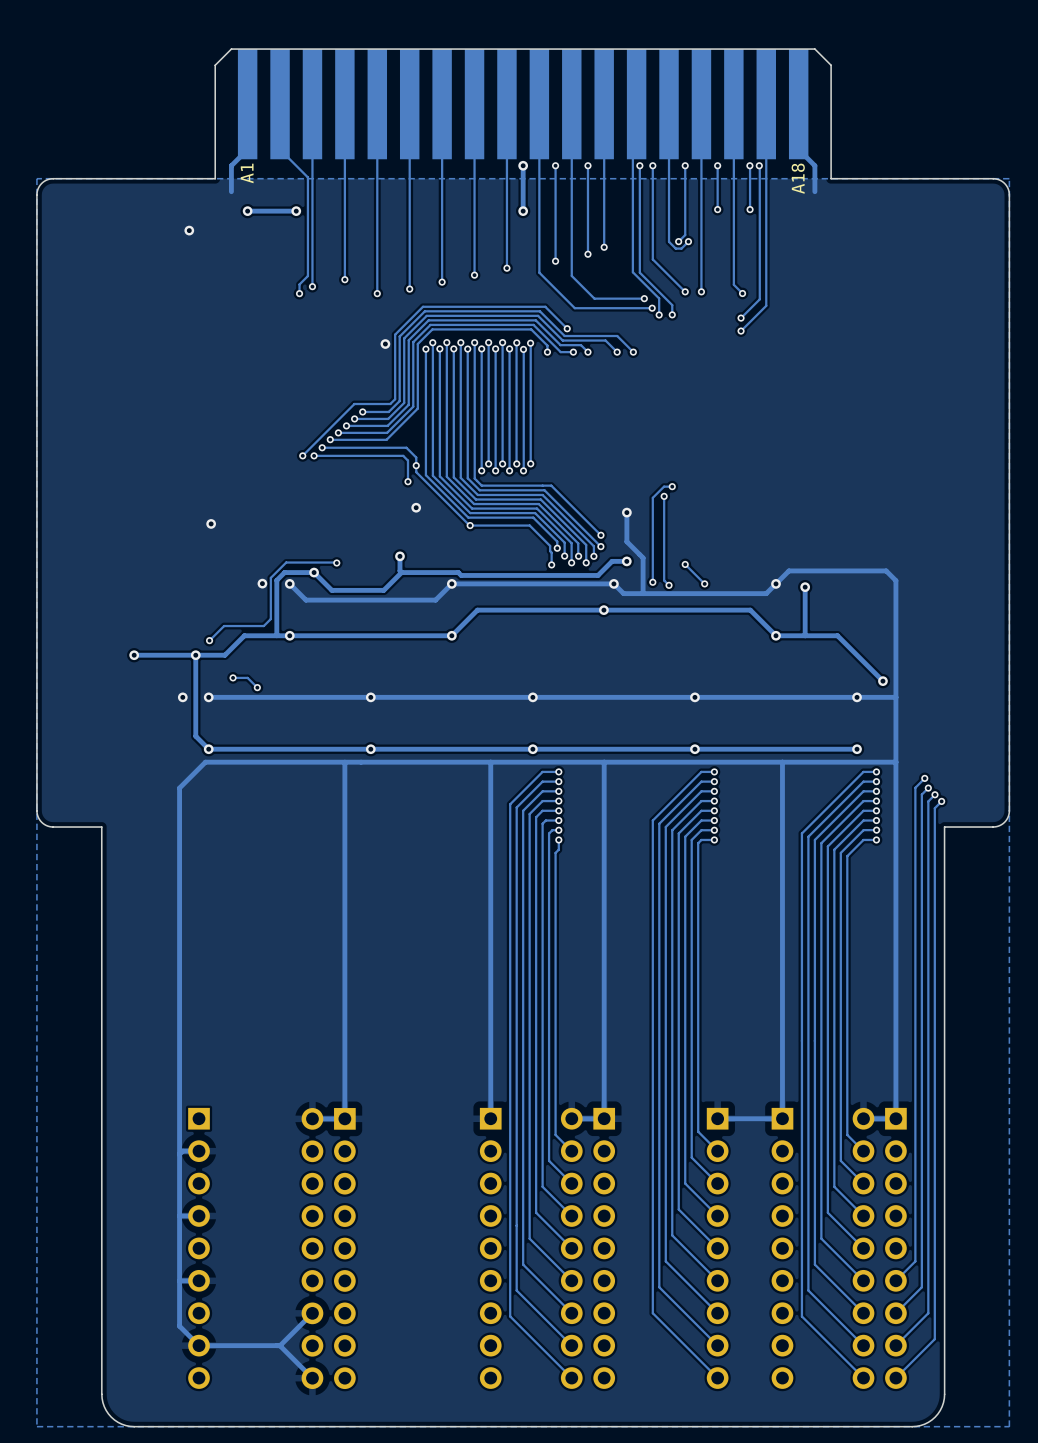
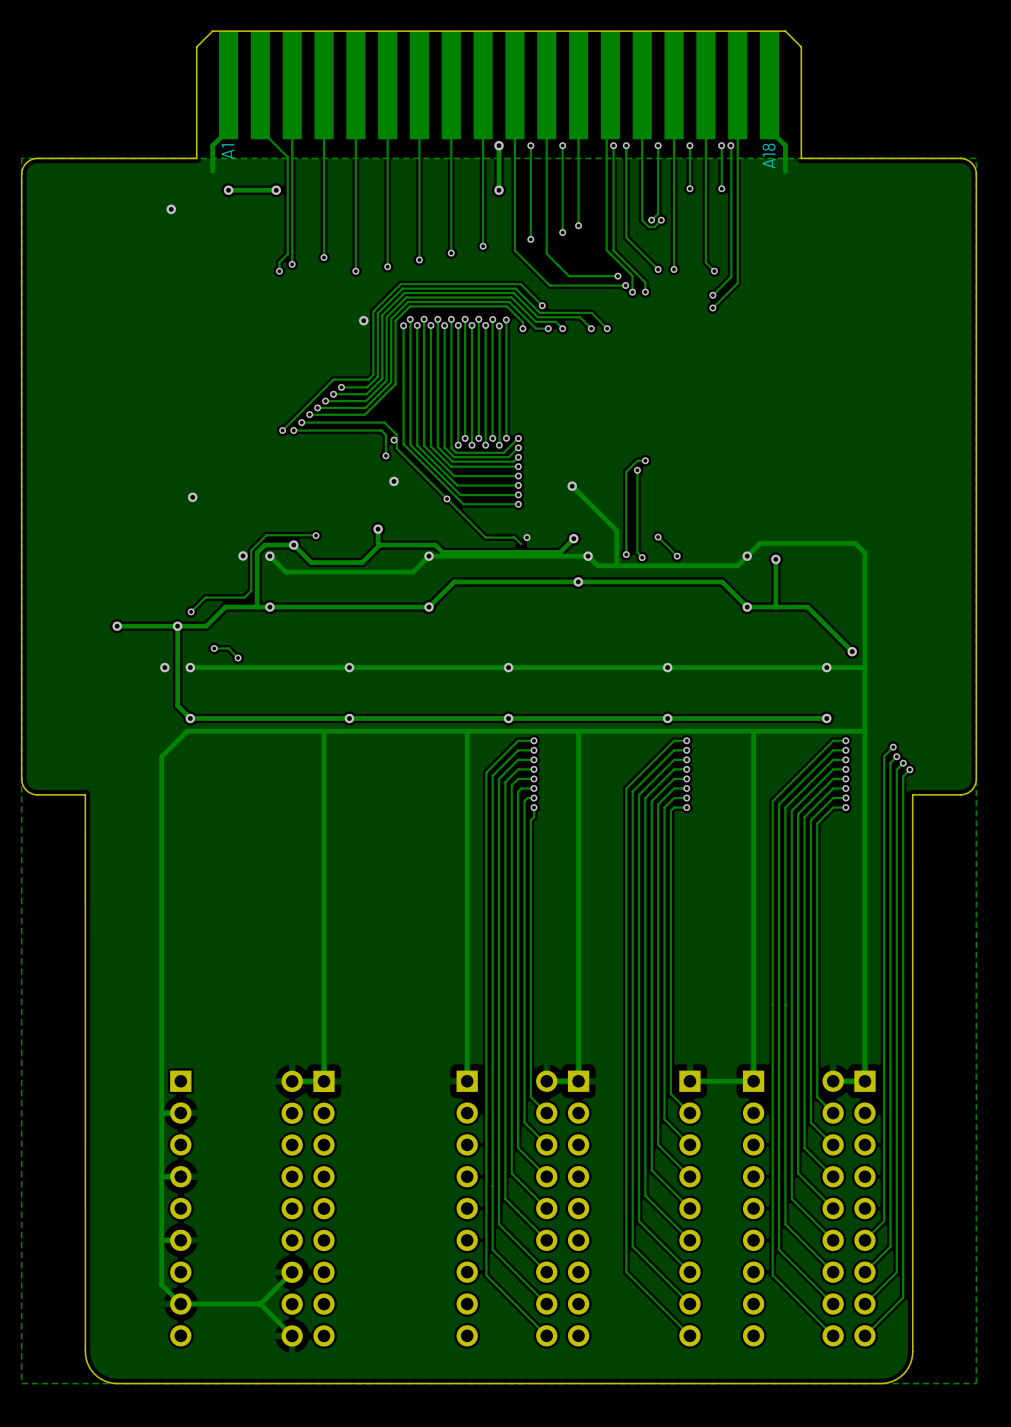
track: (416, 457) (416, 472) (469, 525) (529, 525) (550, 545) (551, 564) -> (394, 432) (396, 434) (396, 448) (485, 537) (514, 537) (521, 544)
via: none -> (518, 438)
track: (425, 469) (425, 475) (468, 517) (533, 517) (557, 541) (557, 548) -> (403, 444) (463, 504) (518, 504)
track: (432, 470) (432, 475) (470, 513) (535, 513) (564, 542) (564, 556) -> (410, 444) (460, 495) (518, 495)
track: (439, 471) (439, 476) (472, 508) (537, 508) (571, 543) (571, 562) -> (417, 445) (457, 485) (518, 485)
track: (446, 471) (446, 476) (474, 504) (538, 504) (578, 543) (578, 556) -> (424, 445) (454, 476) (518, 476)
track: (453, 472) (453, 477) (475, 499) (540, 499) (586, 544) (586, 562) -> (430, 446) (451, 466) (518, 466)
track: (460, 472) (460, 477) (477, 494) (542, 494) (593, 546) (593, 556) -> (437, 447) (452, 461) (513, 461) (518, 457)
track: (467, 473) (467, 478) (479, 490) (544, 490) (600, 546) -> (444, 447) (454, 457) (508, 457) (518, 447)
track: (474, 473) (474, 478) (481, 485) (551, 485) (600, 535) -> (451, 448) (456, 452) (503, 452) (518, 438)
via: none -> (518, 447)
via: none -> (518, 457)
via: none -> (518, 466)
via: none -> (518, 476)
via: none -> (518, 485)
via: none -> (572, 486)
track: (626, 512) (626, 541) -> (572, 486) (600, 514)
via: (626, 512) -> none
via: none -> (518, 494)
via: none -> (518, 504)
via: (600, 535) -> none
via: (600, 546) -> none
via: (557, 548) -> none
via: (564, 556) -> none
via: (578, 556) -> none
via: (593, 556) -> none
track: (626, 561) (612, 561) (598, 575) (461, 575) -> (573, 538) (560, 552) (442, 552) (438, 547)
via position: (626, 561) -> (573, 538)
via: (571, 562) -> none
via: (586, 562) -> none

